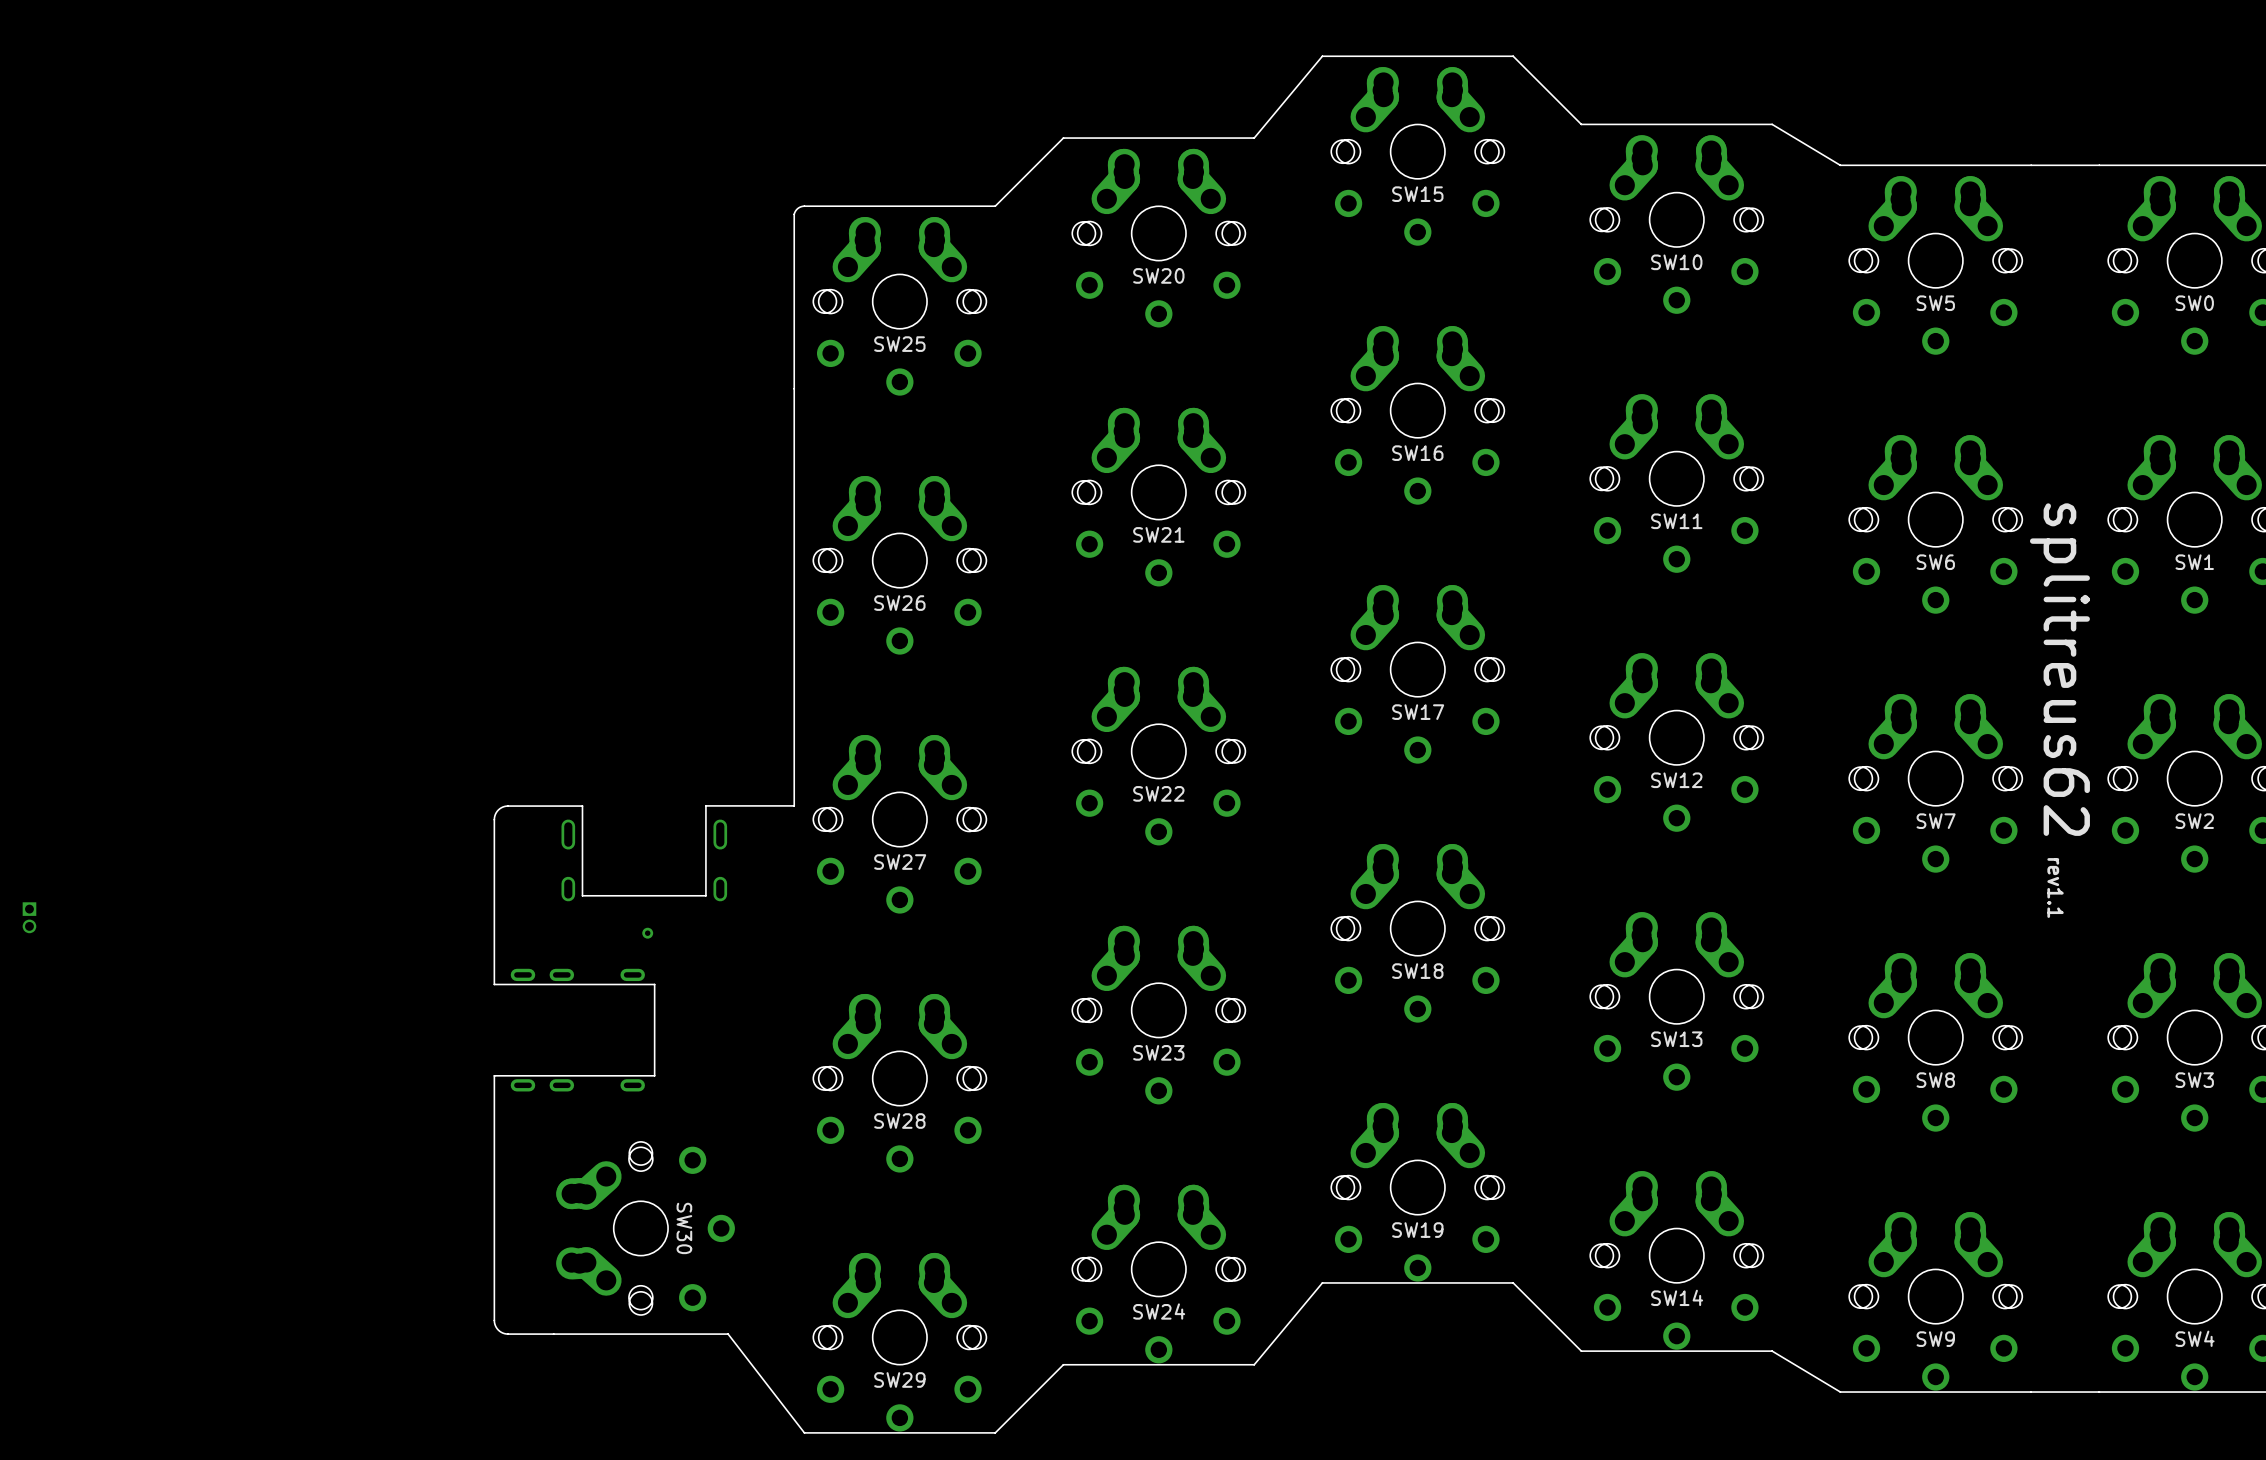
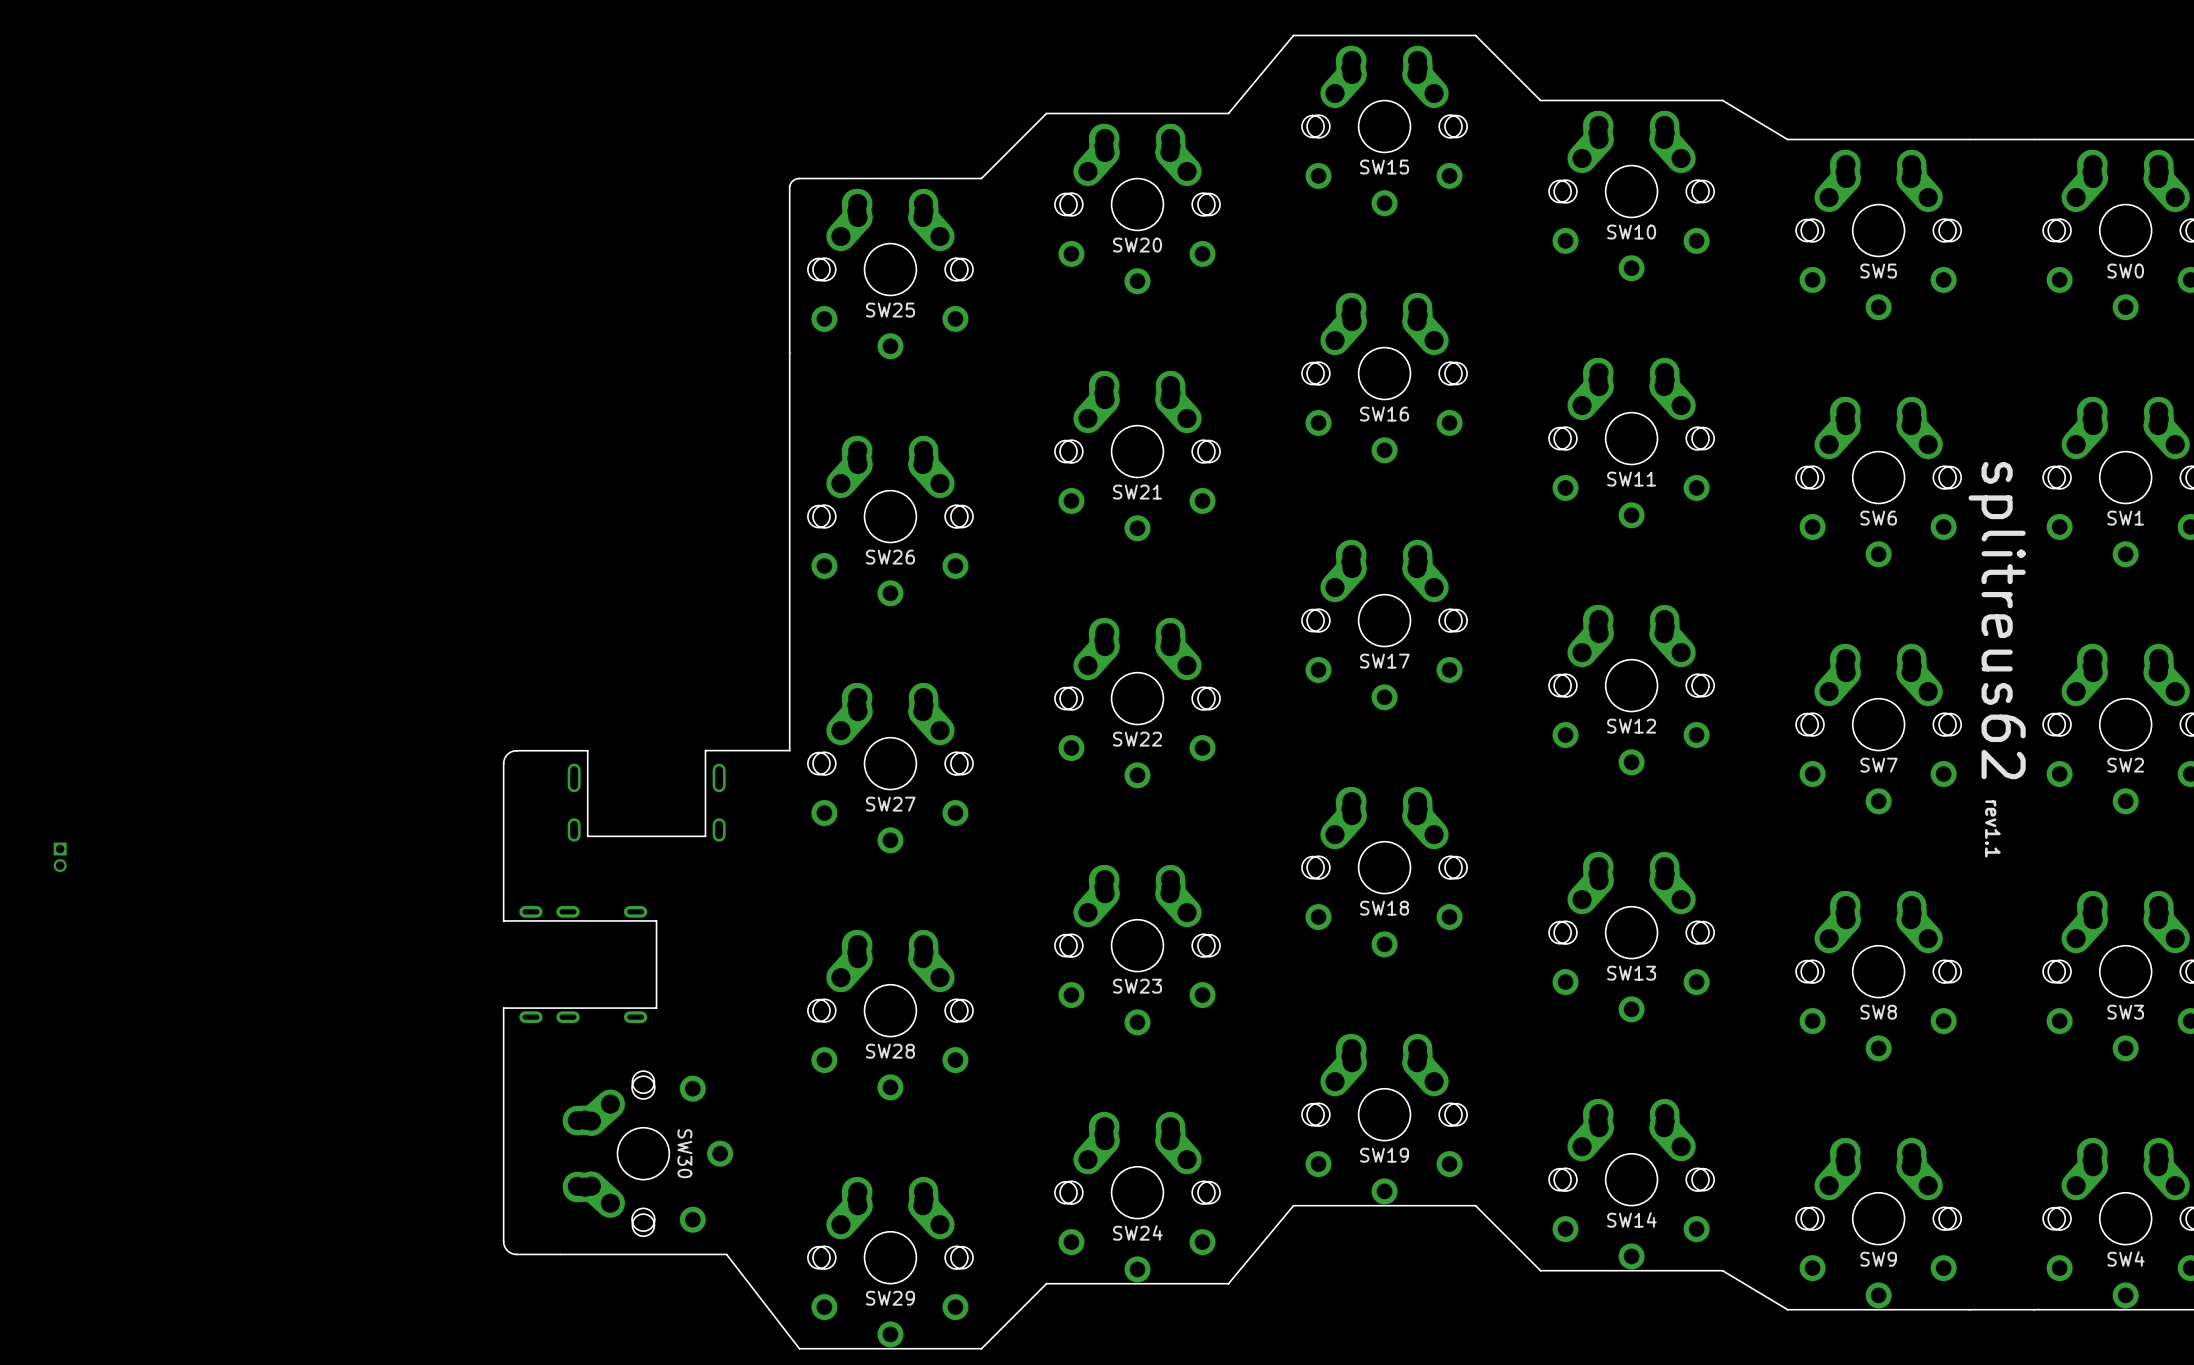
via: (647, 933) -> none

